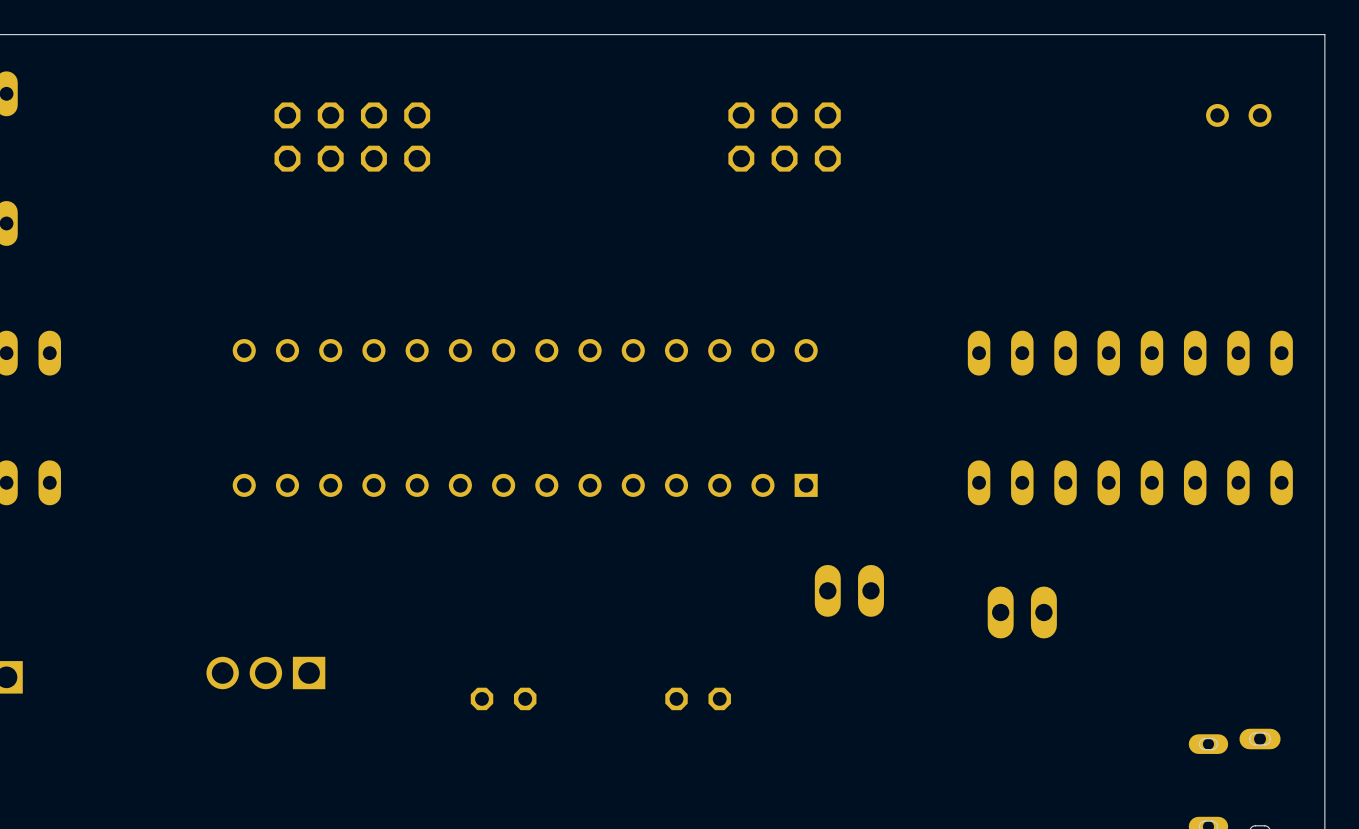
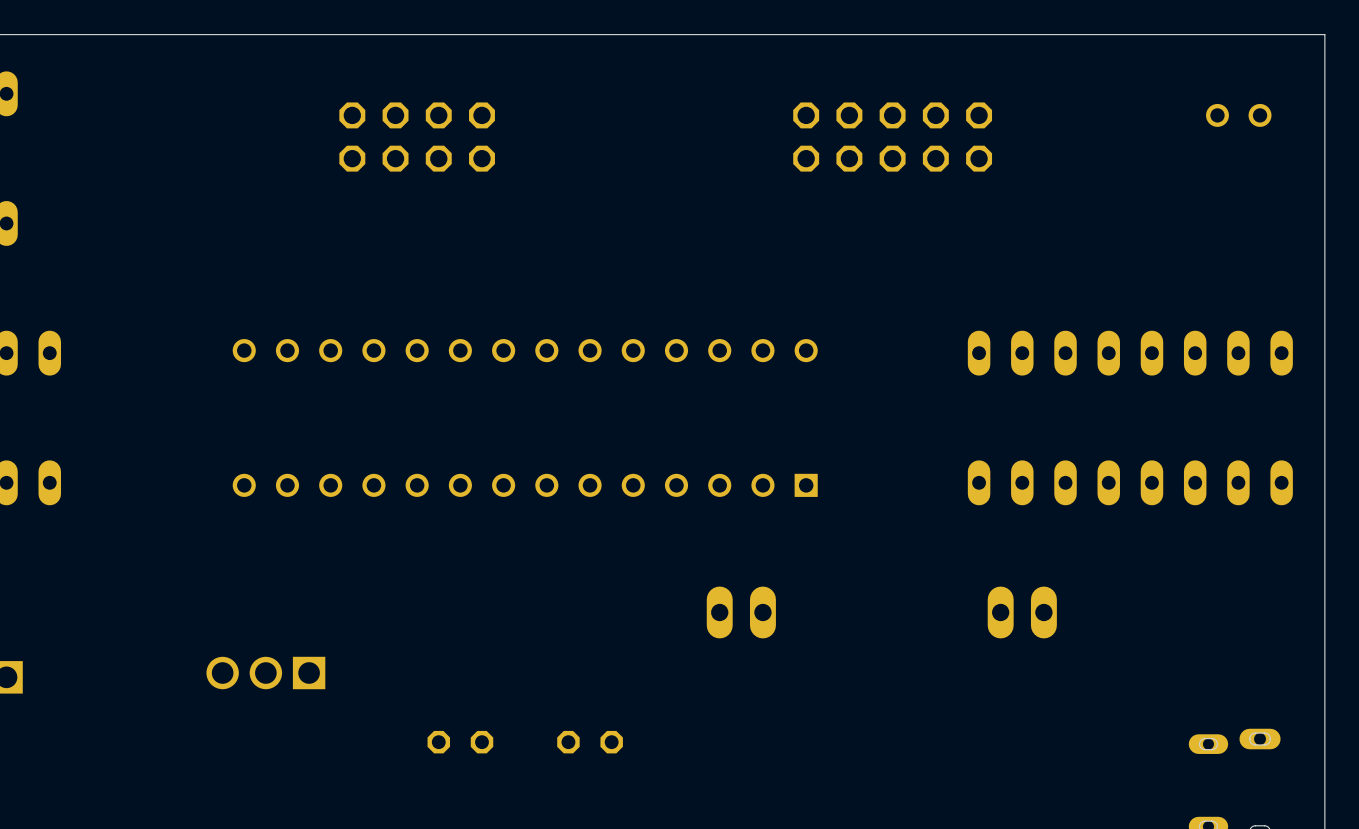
part position: (352, 137) -> (417, 137)
part: (784, 137) -> none
part: none -> (892, 137)
part position: (849, 590) -> (741, 612)
part: (503, 698) -> none
part: (698, 698) -> none
part: none -> (460, 742)
part: none -> (590, 742)

